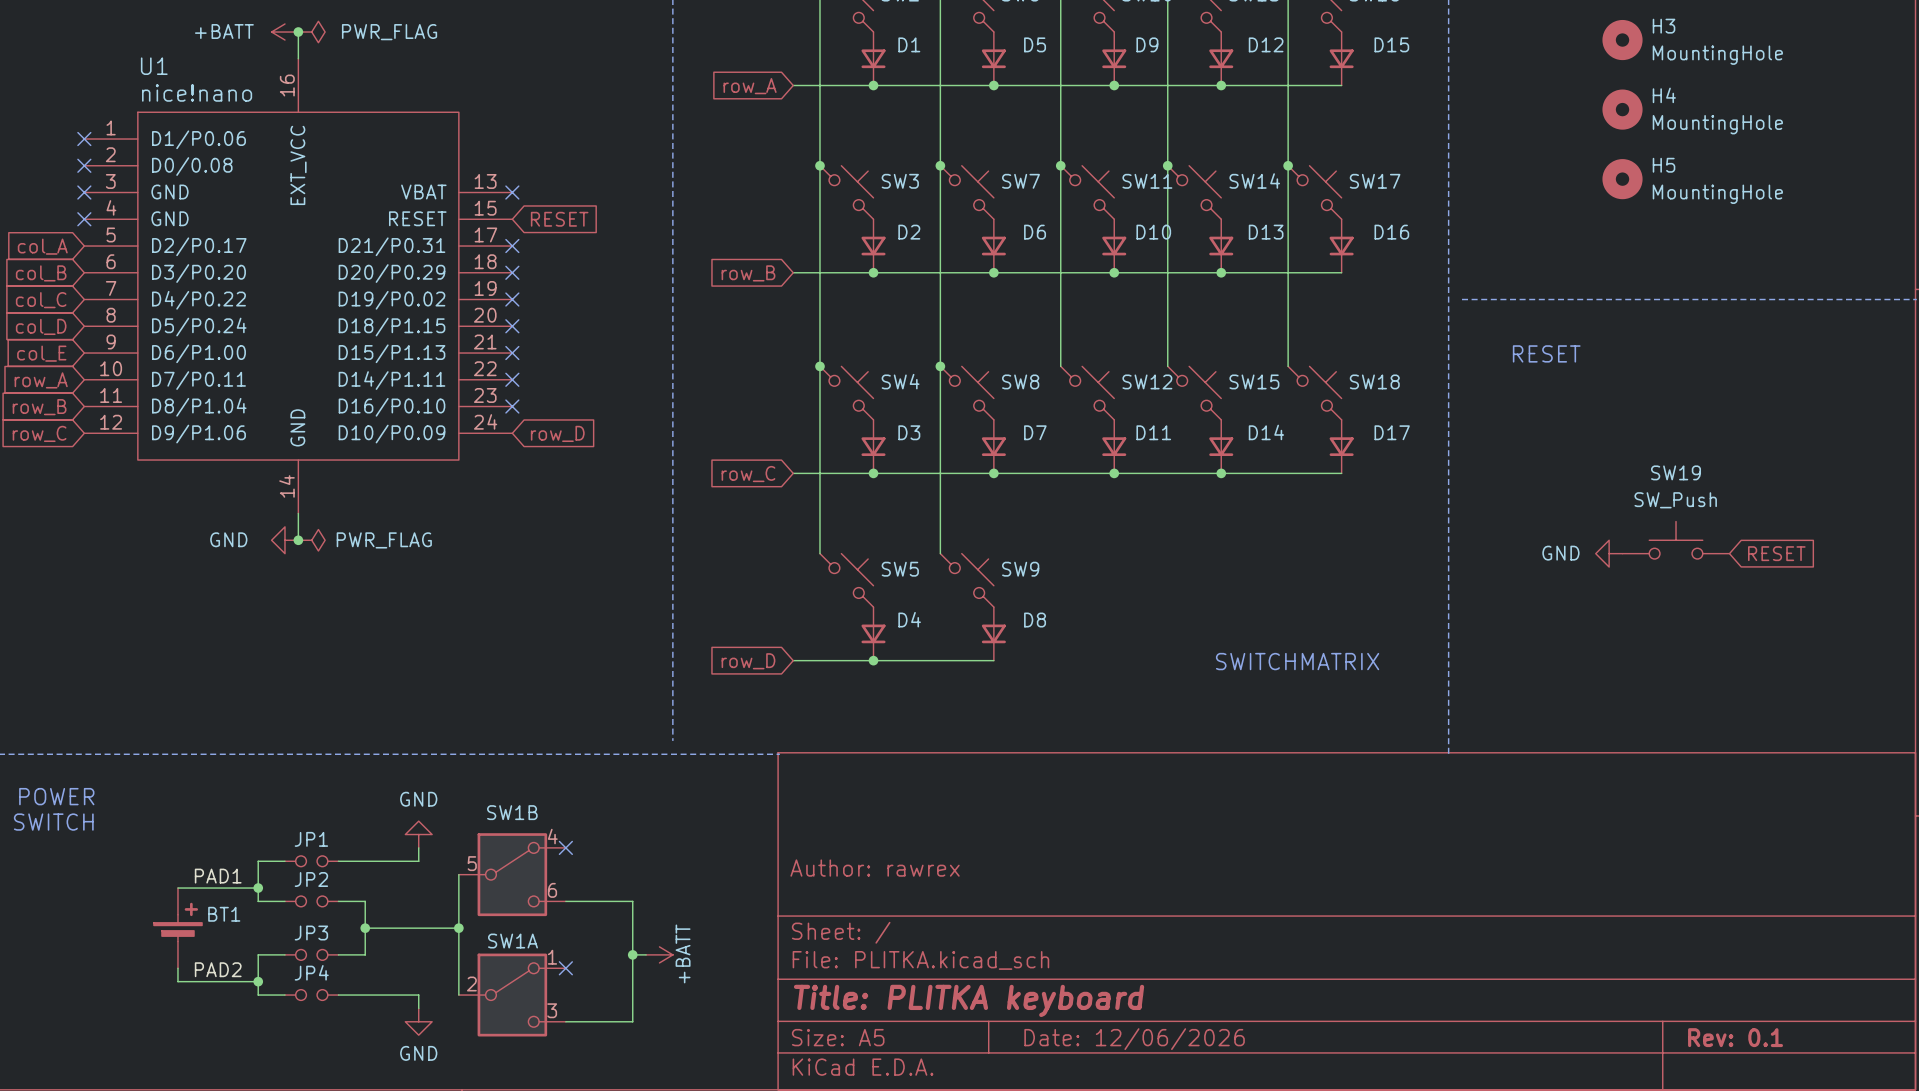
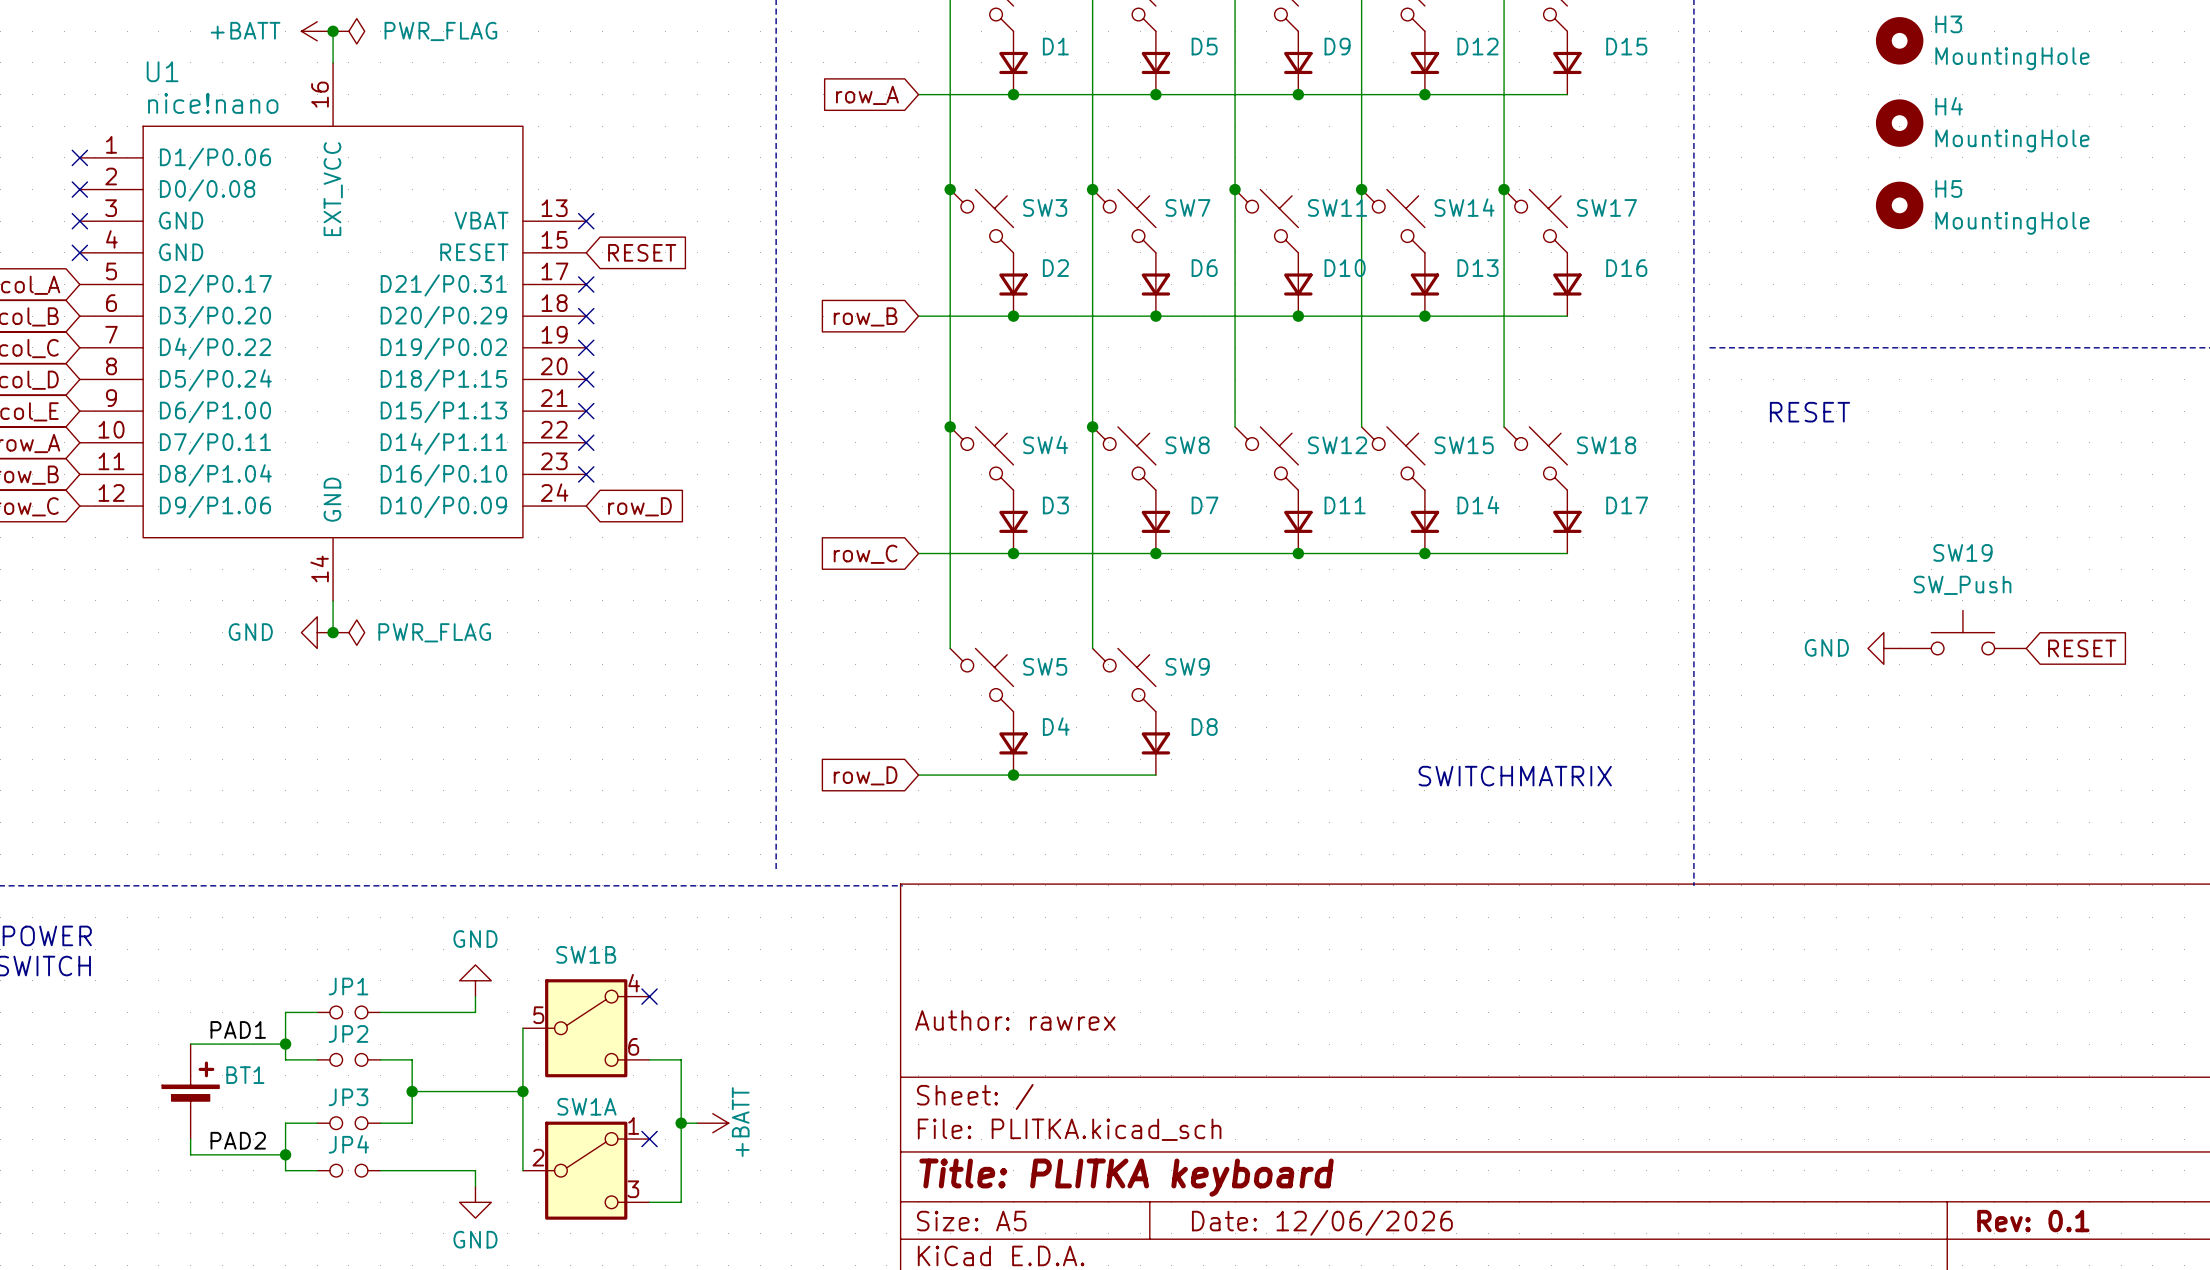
wire: (592, 901) (632, 901) (632, 1021) (592, 1021) -> (681, 1059) (681, 1202)
wire: (632, 954) (646, 954) -> (681, 1123) (697, 1123)
junction position: (632, 954) -> (681, 1123)
power symbol position: +BATT (659, 954) -> +BATT (712, 1123)

